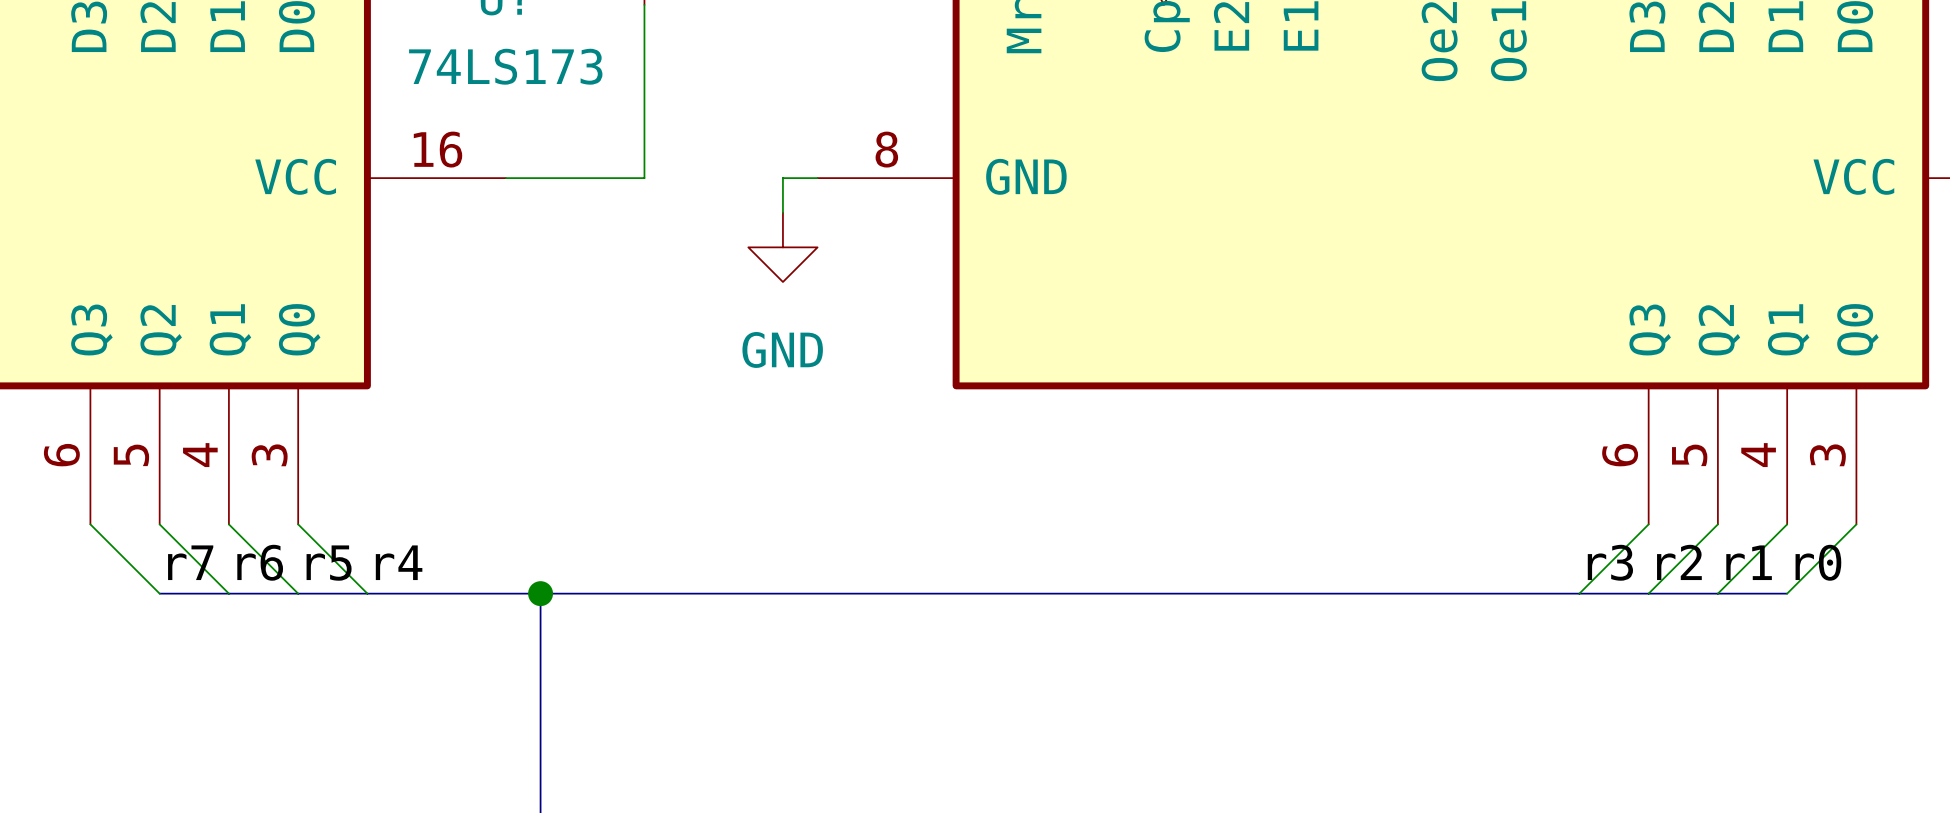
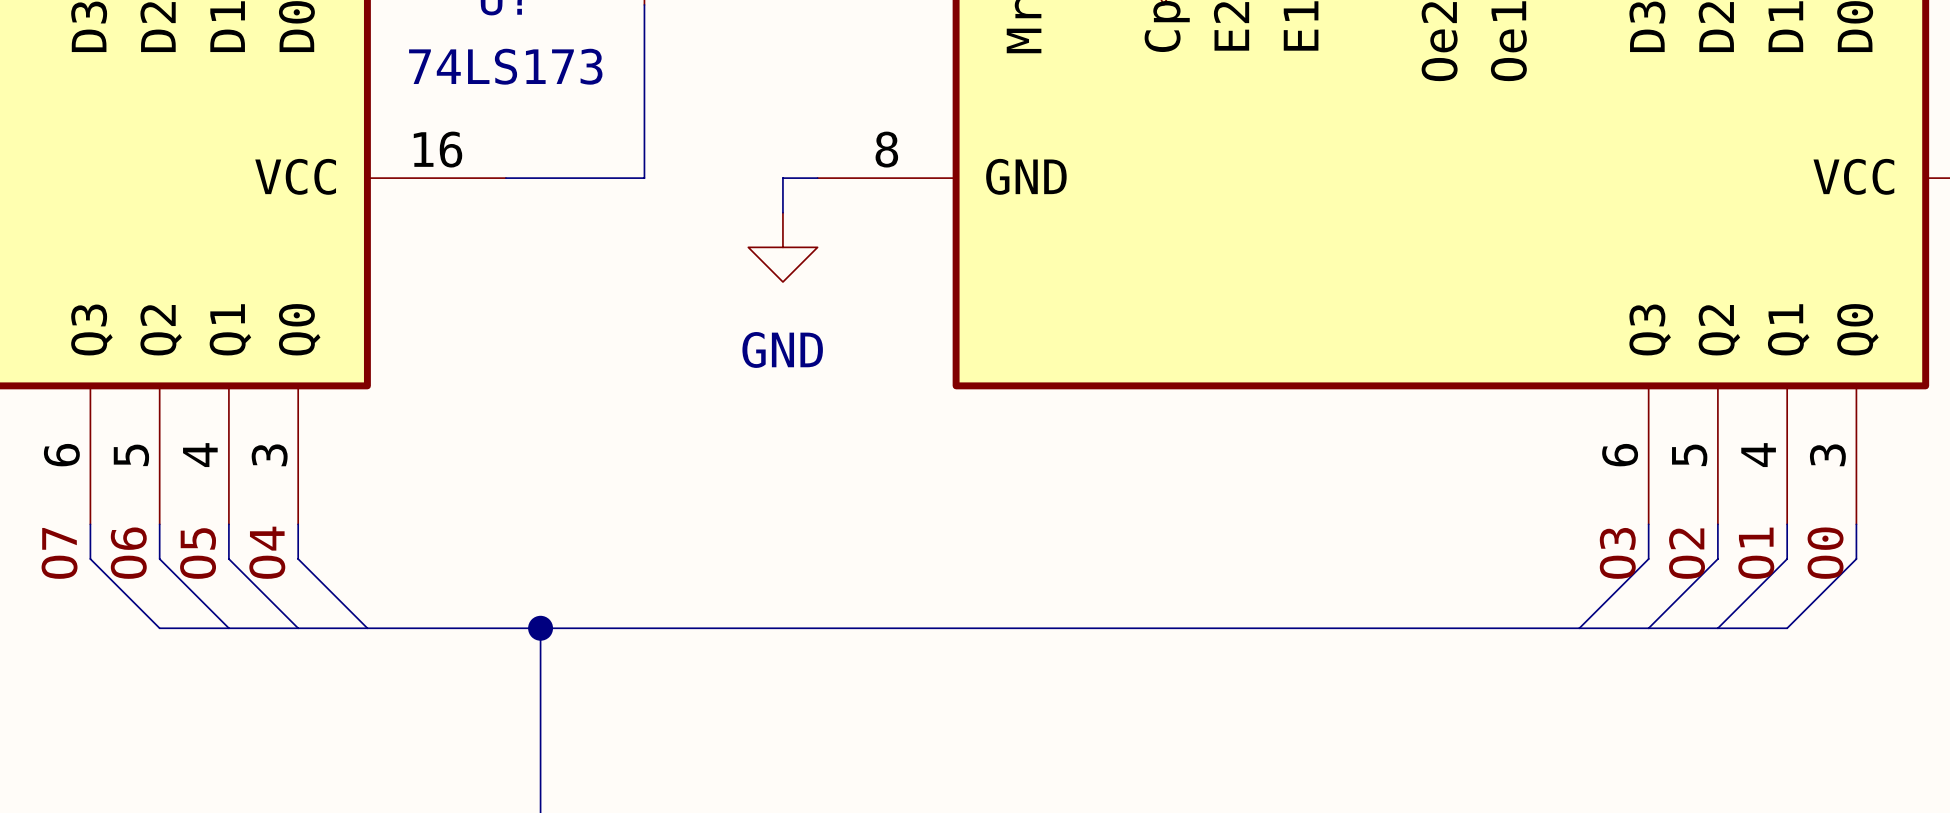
wire: (90, 524) (159, 593) -> (90, 524) (90, 559) (159, 628)
wire: (159, 524) (228, 593) -> (159, 524) (159, 559) (228, 628)
wire: (228, 524) (298, 593) -> (228, 524) (228, 559) (298, 628)
wire: (298, 524) (367, 593) -> (298, 524) (298, 559) (367, 628)
wire: (1648, 524) (1579, 593) -> (1648, 524) (1648, 559) (1579, 628)
wire: (1717, 524) (1648, 593) -> (1717, 524) (1717, 559) (1648, 628)
wire: (1787, 524) (1717, 593) -> (1787, 524) (1787, 559) (1717, 628)
wire: (1856, 524) (1787, 593) -> (1856, 524) (1856, 559) (1787, 628)
label: none -> O4 (267, 552)
label: none -> O7 (59, 553)
label: none -> O6 (128, 553)
label: none -> O5 (198, 553)
label: none -> O3 (1617, 553)
label: none -> O2 (1687, 553)
label: none -> O1 (1756, 553)
label: none -> O0 (1825, 553)
label: r7 (190, 562) -> none
label: r6 (260, 562) -> none
label: r4 (399, 562) -> none
label: r3 (1610, 562) -> none
label: r2 (1679, 562) -> none
label: r1 (1749, 562) -> none
label: r0 (1818, 562) -> none
label: r5 (329, 563) -> none
bus: (159, 593) (1787, 593) -> (159, 628) (1787, 628)
bus: (540, 593) (540, 628) -> none
junction position: (540, 593) -> (540, 628)

